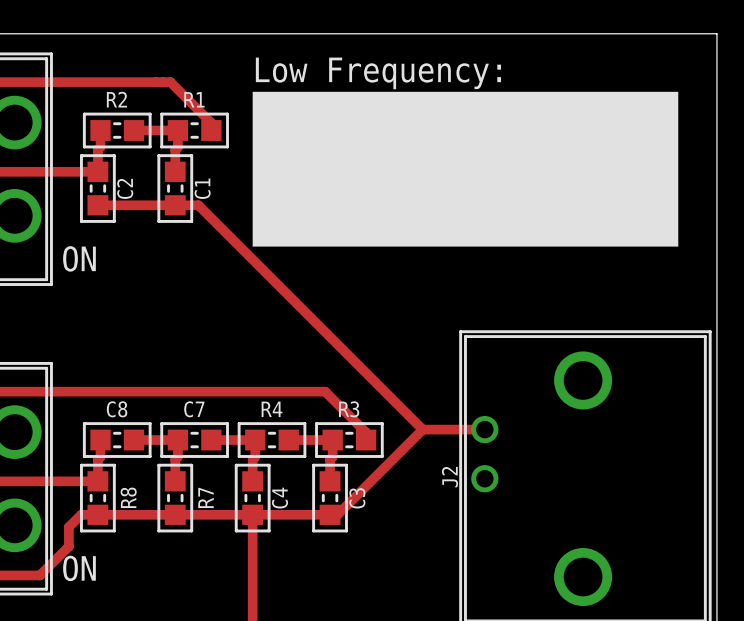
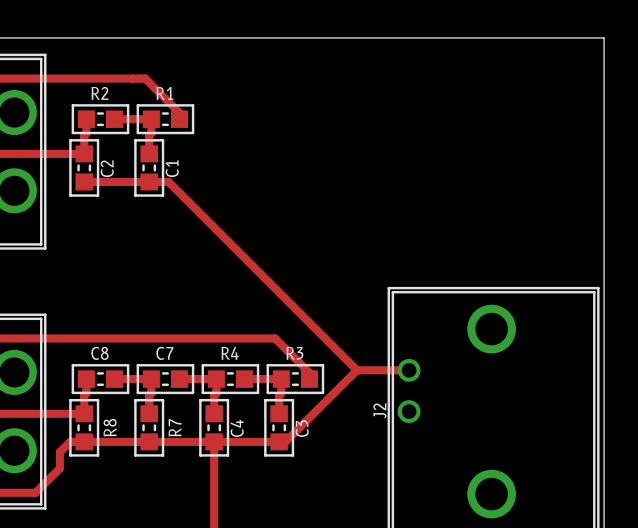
text: Low Frequency: (378, 73) -> none
drawing: [252, 91, 679, 247] -> none
text: ON (79, 258) -> none
text: ON (79, 568) -> none

